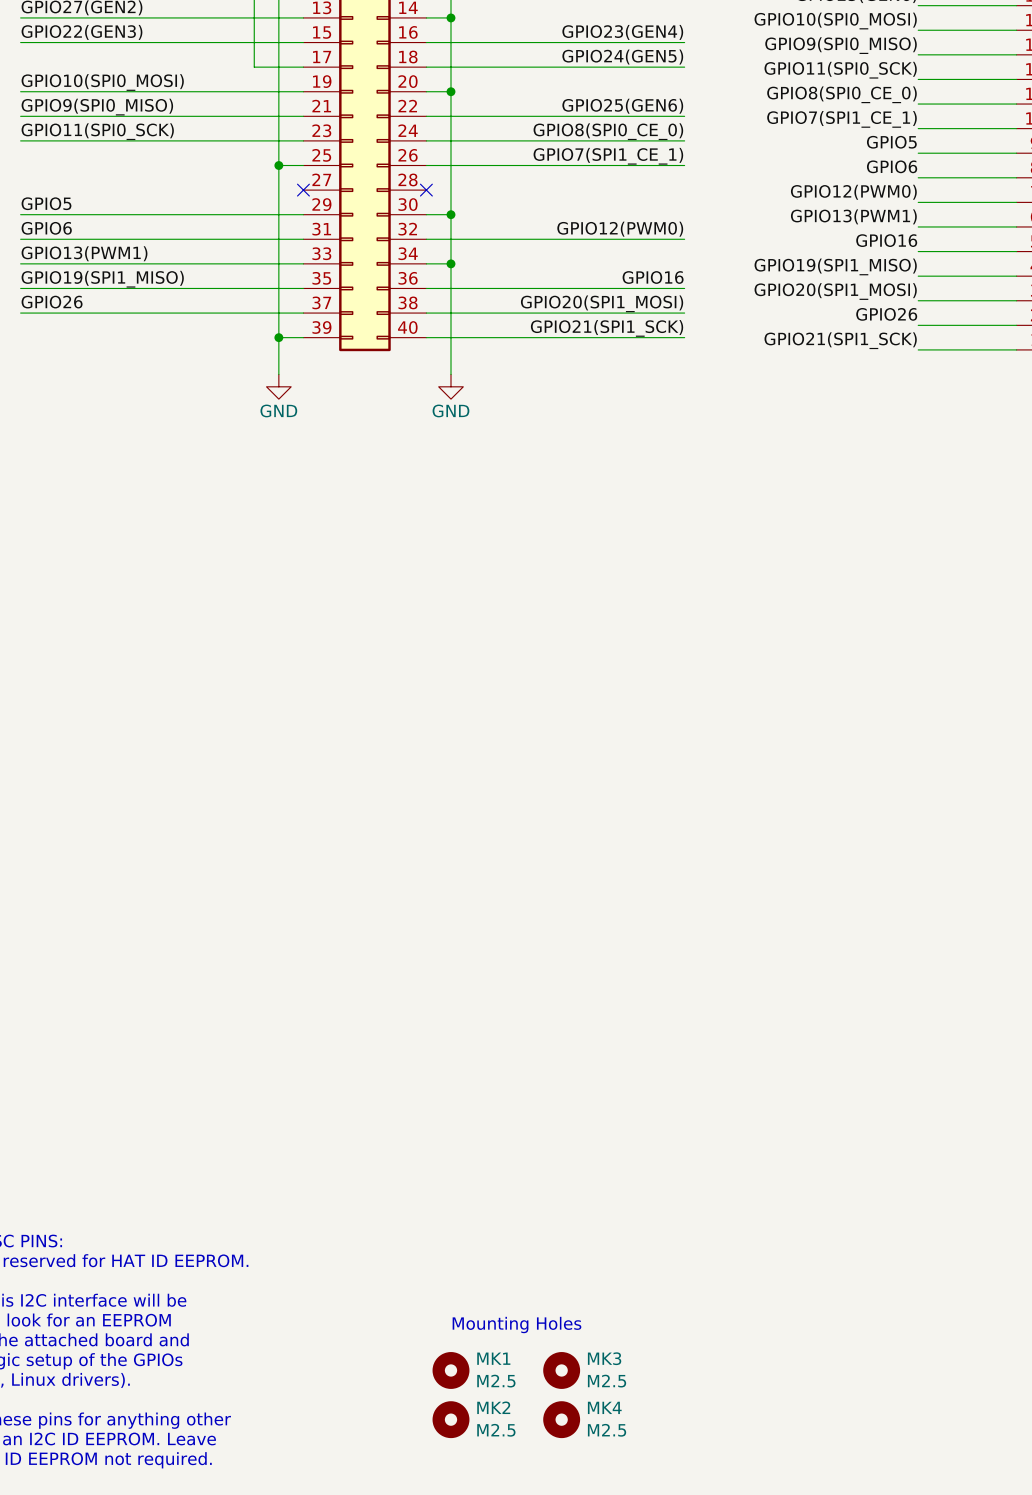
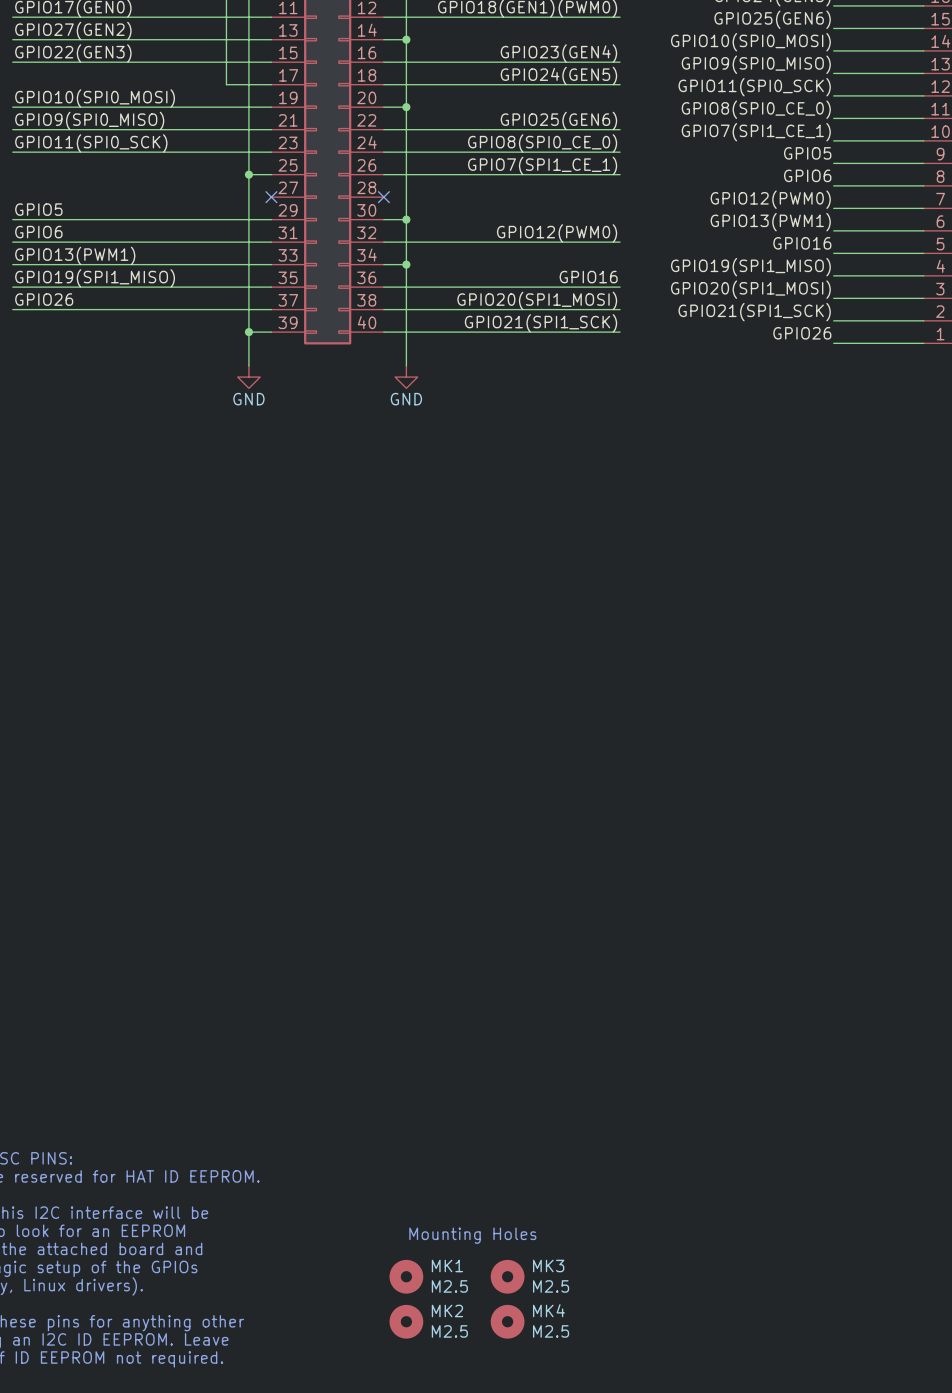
label: GPIO26 (886, 314) -> GPIO21(SPI1_SCK) (754, 312)
label: GPIO21(SPI1_SCK) (840, 340) -> GPIO26 (802, 333)

